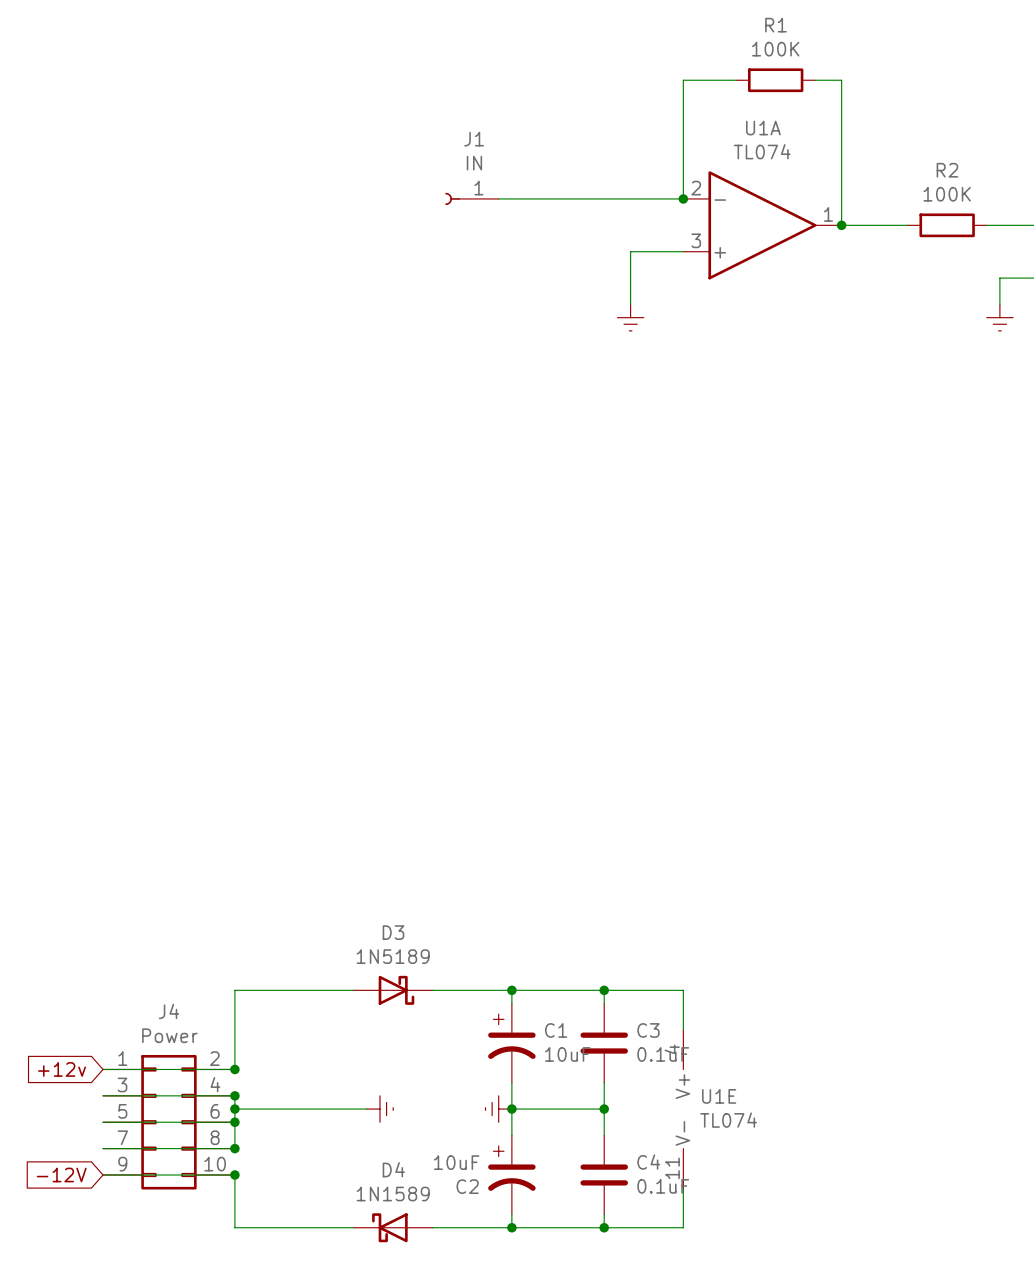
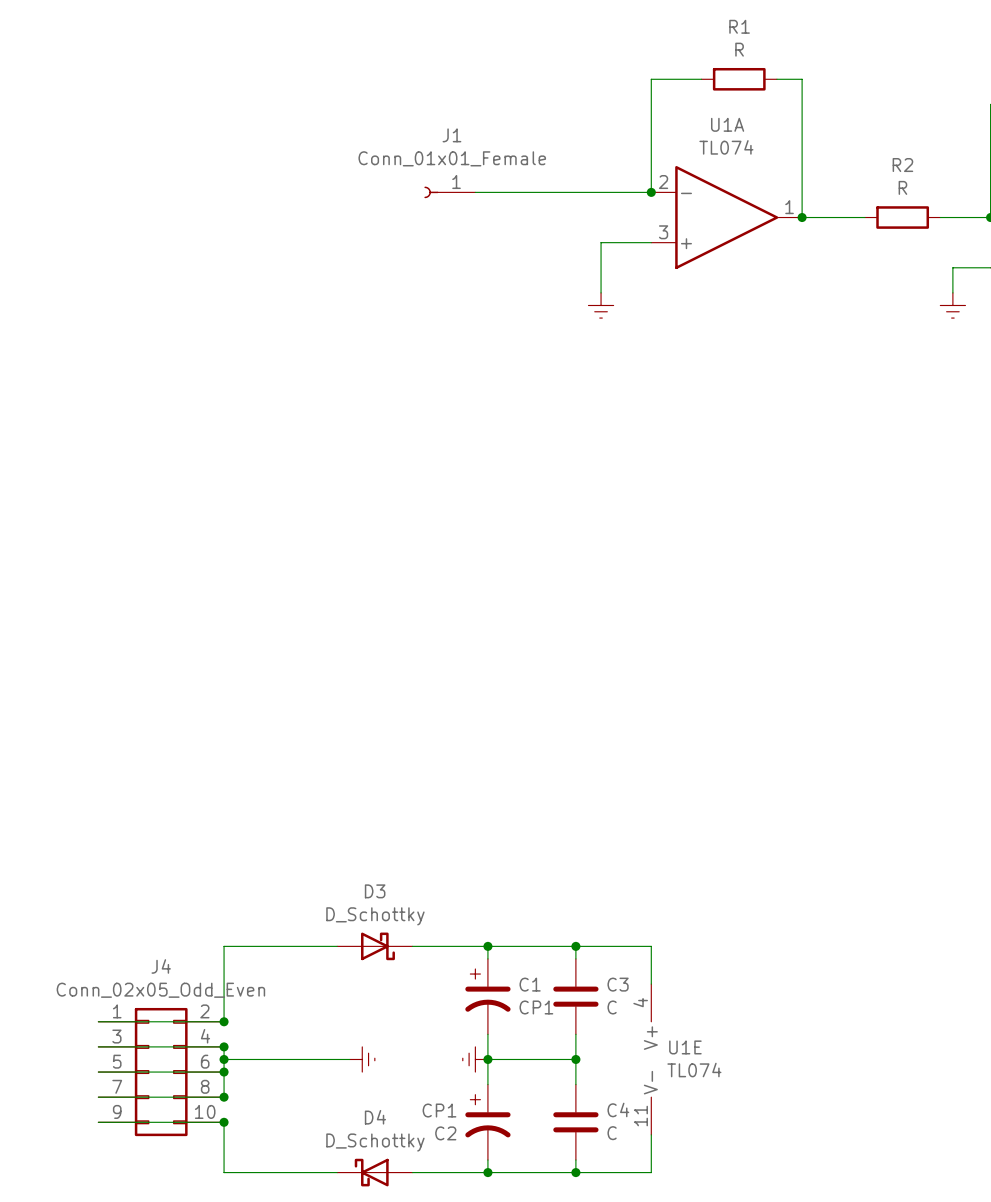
R1 value: 100K (775, 49) -> R (739, 49)
J1 value: IN (474, 163) -> Conn_01x01_Female (452, 158)
R2 value: 100K (947, 194) -> R (902, 187)
D3 value: 1N5189 (393, 956) -> D_Schottky (375, 916)
J4 value: Power (169, 1035) -> Conn_02x05_Odd_Even (160, 990)
C1 value: 10uF (567, 1054) -> CP1 (536, 1007)
C3 value: 0.1uF (663, 1054) -> C (612, 1007)
global label: +12v (62, 1069) -> none
C2 value: 10uF (456, 1162) -> CP1 (439, 1110)
global label: -12V (61, 1174) -> none
C4 value: 0.1uF (663, 1186) -> C (612, 1133)
D4 value: 1N1589 (393, 1194) -> D_Schottky (375, 1142)

